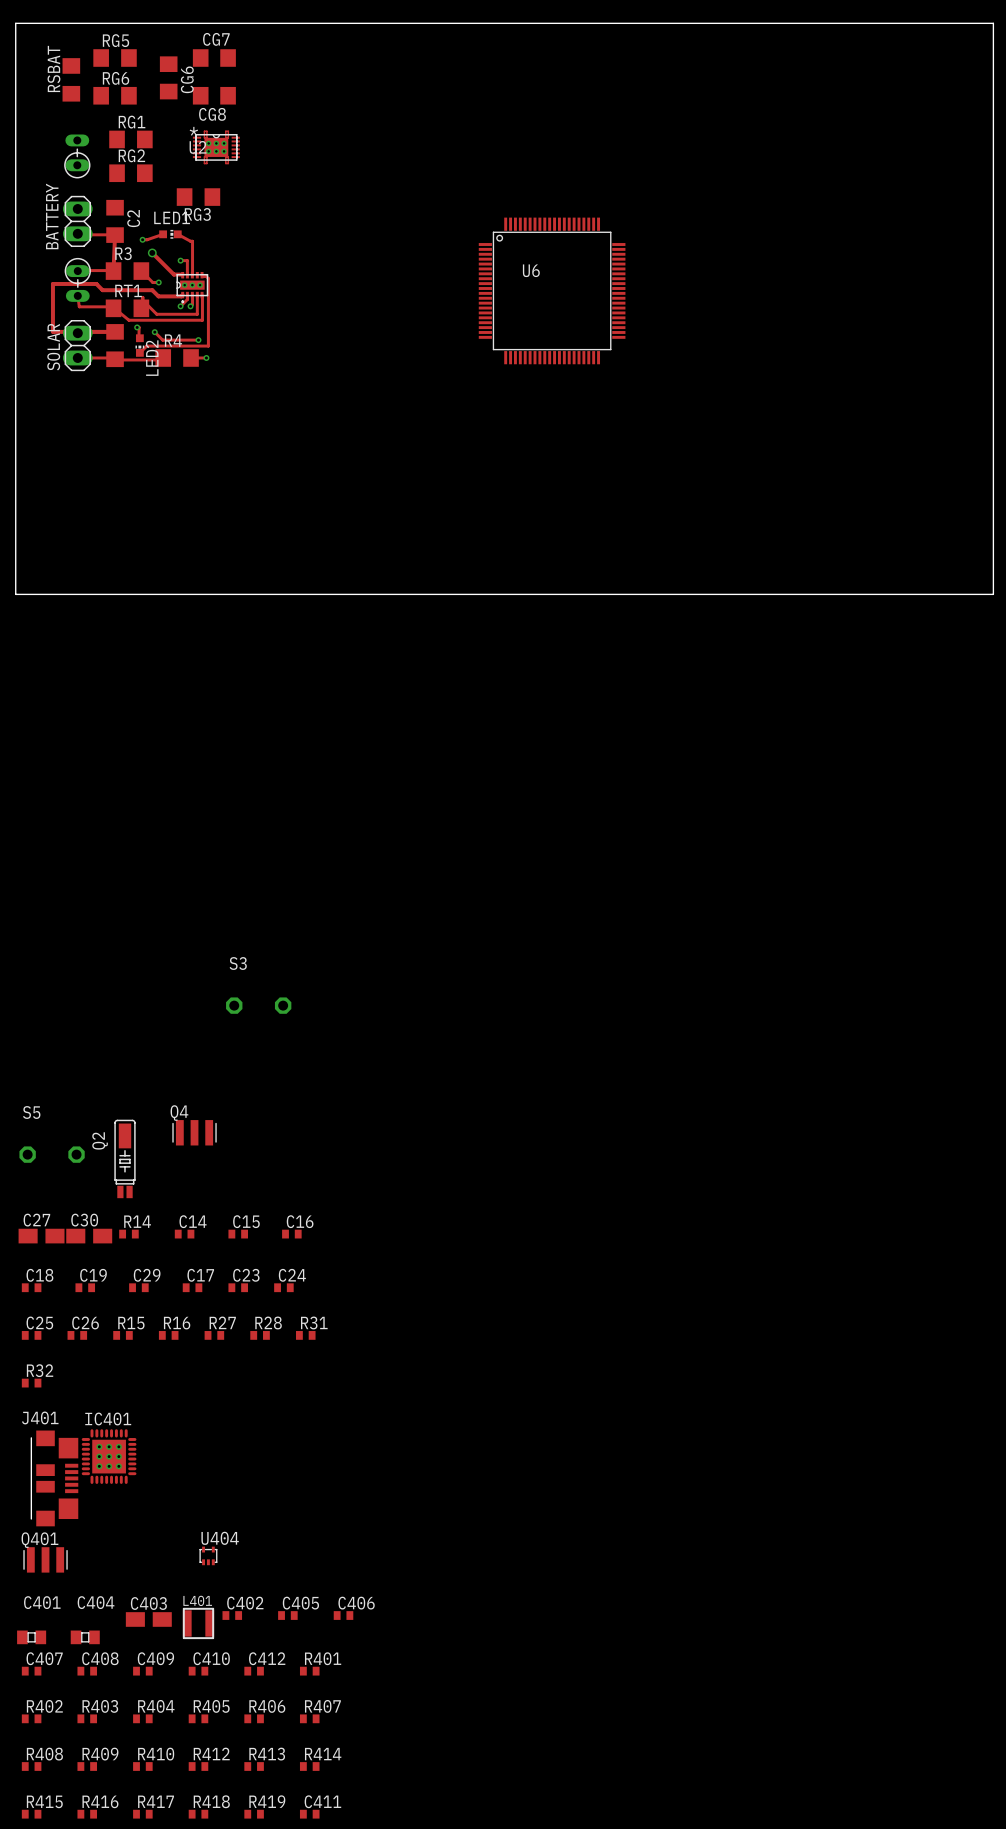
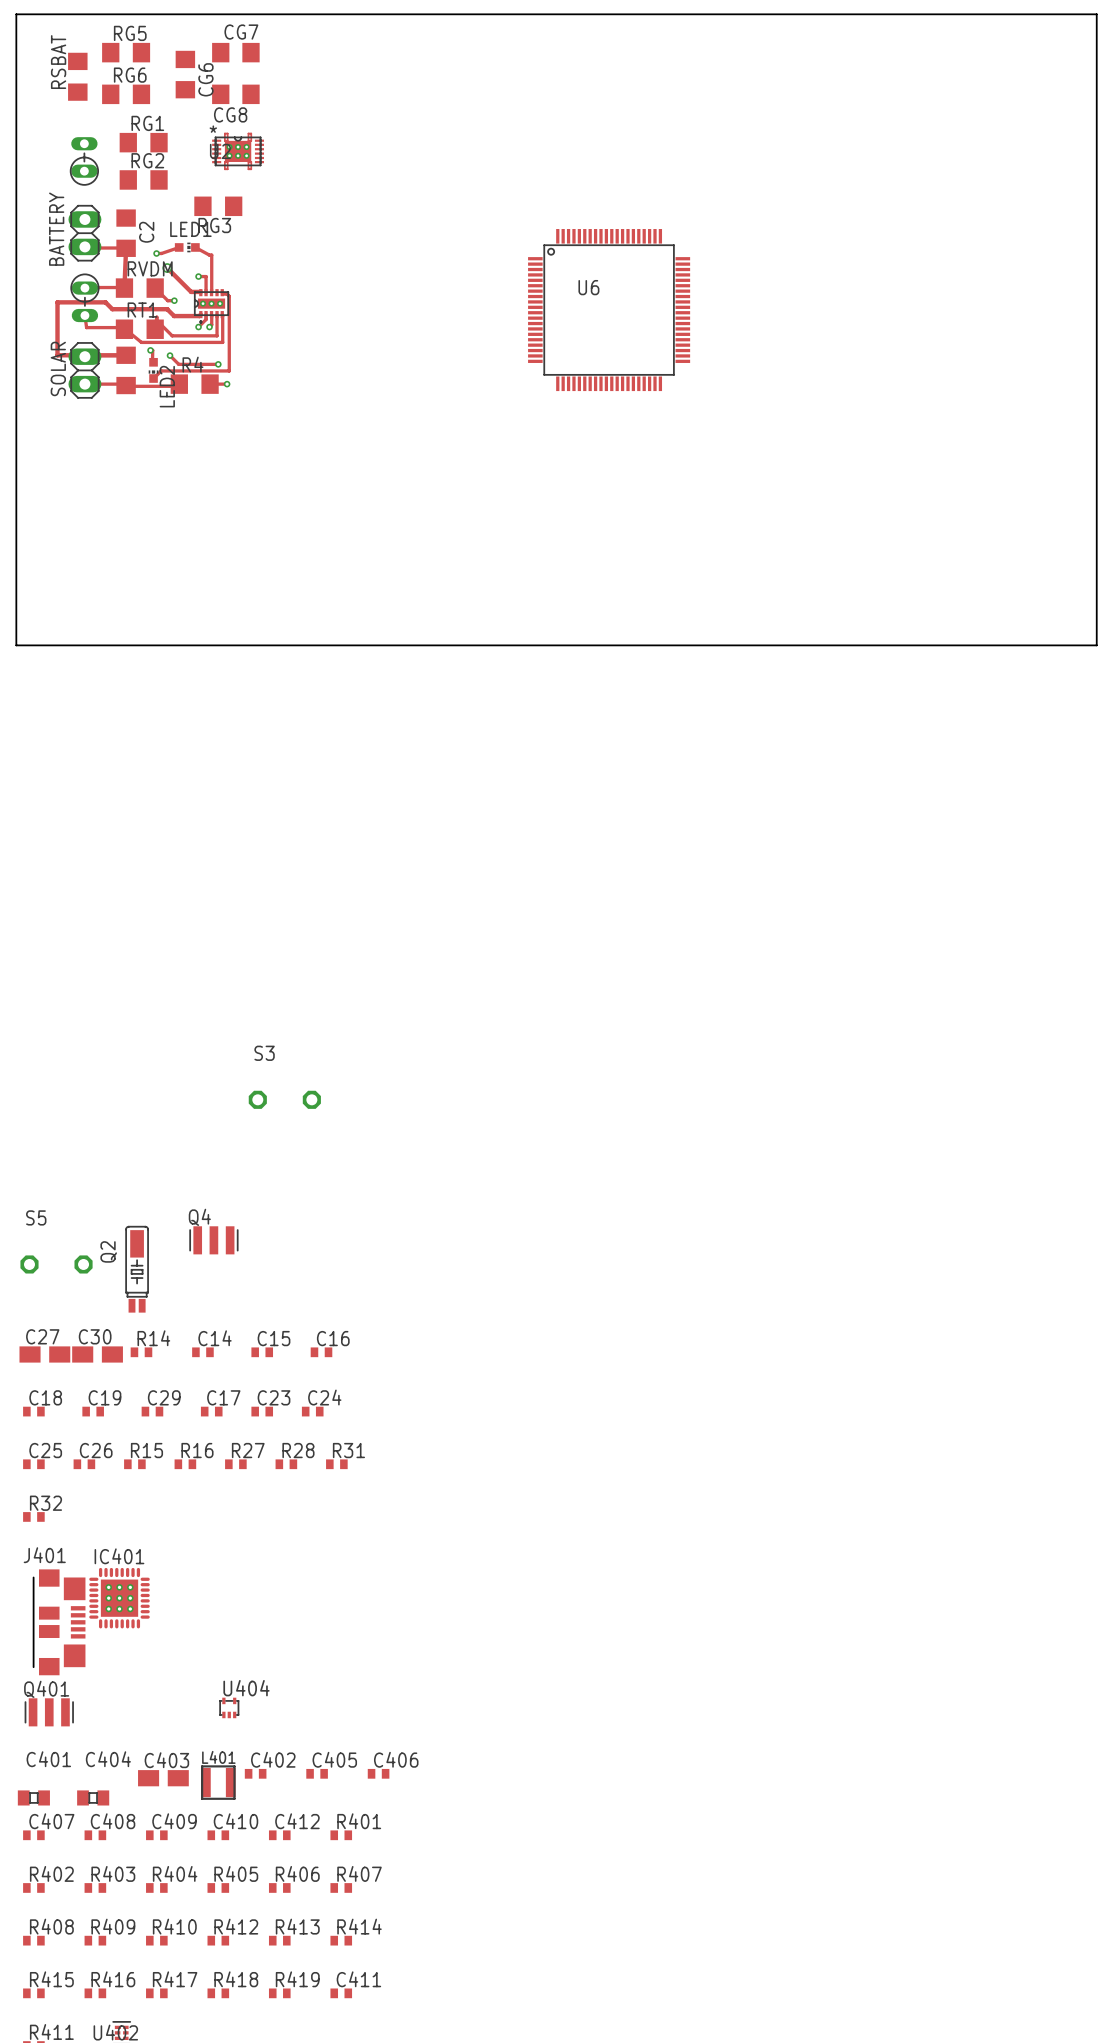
R3 name: R3 (123, 253) -> RVDM (150, 268)

